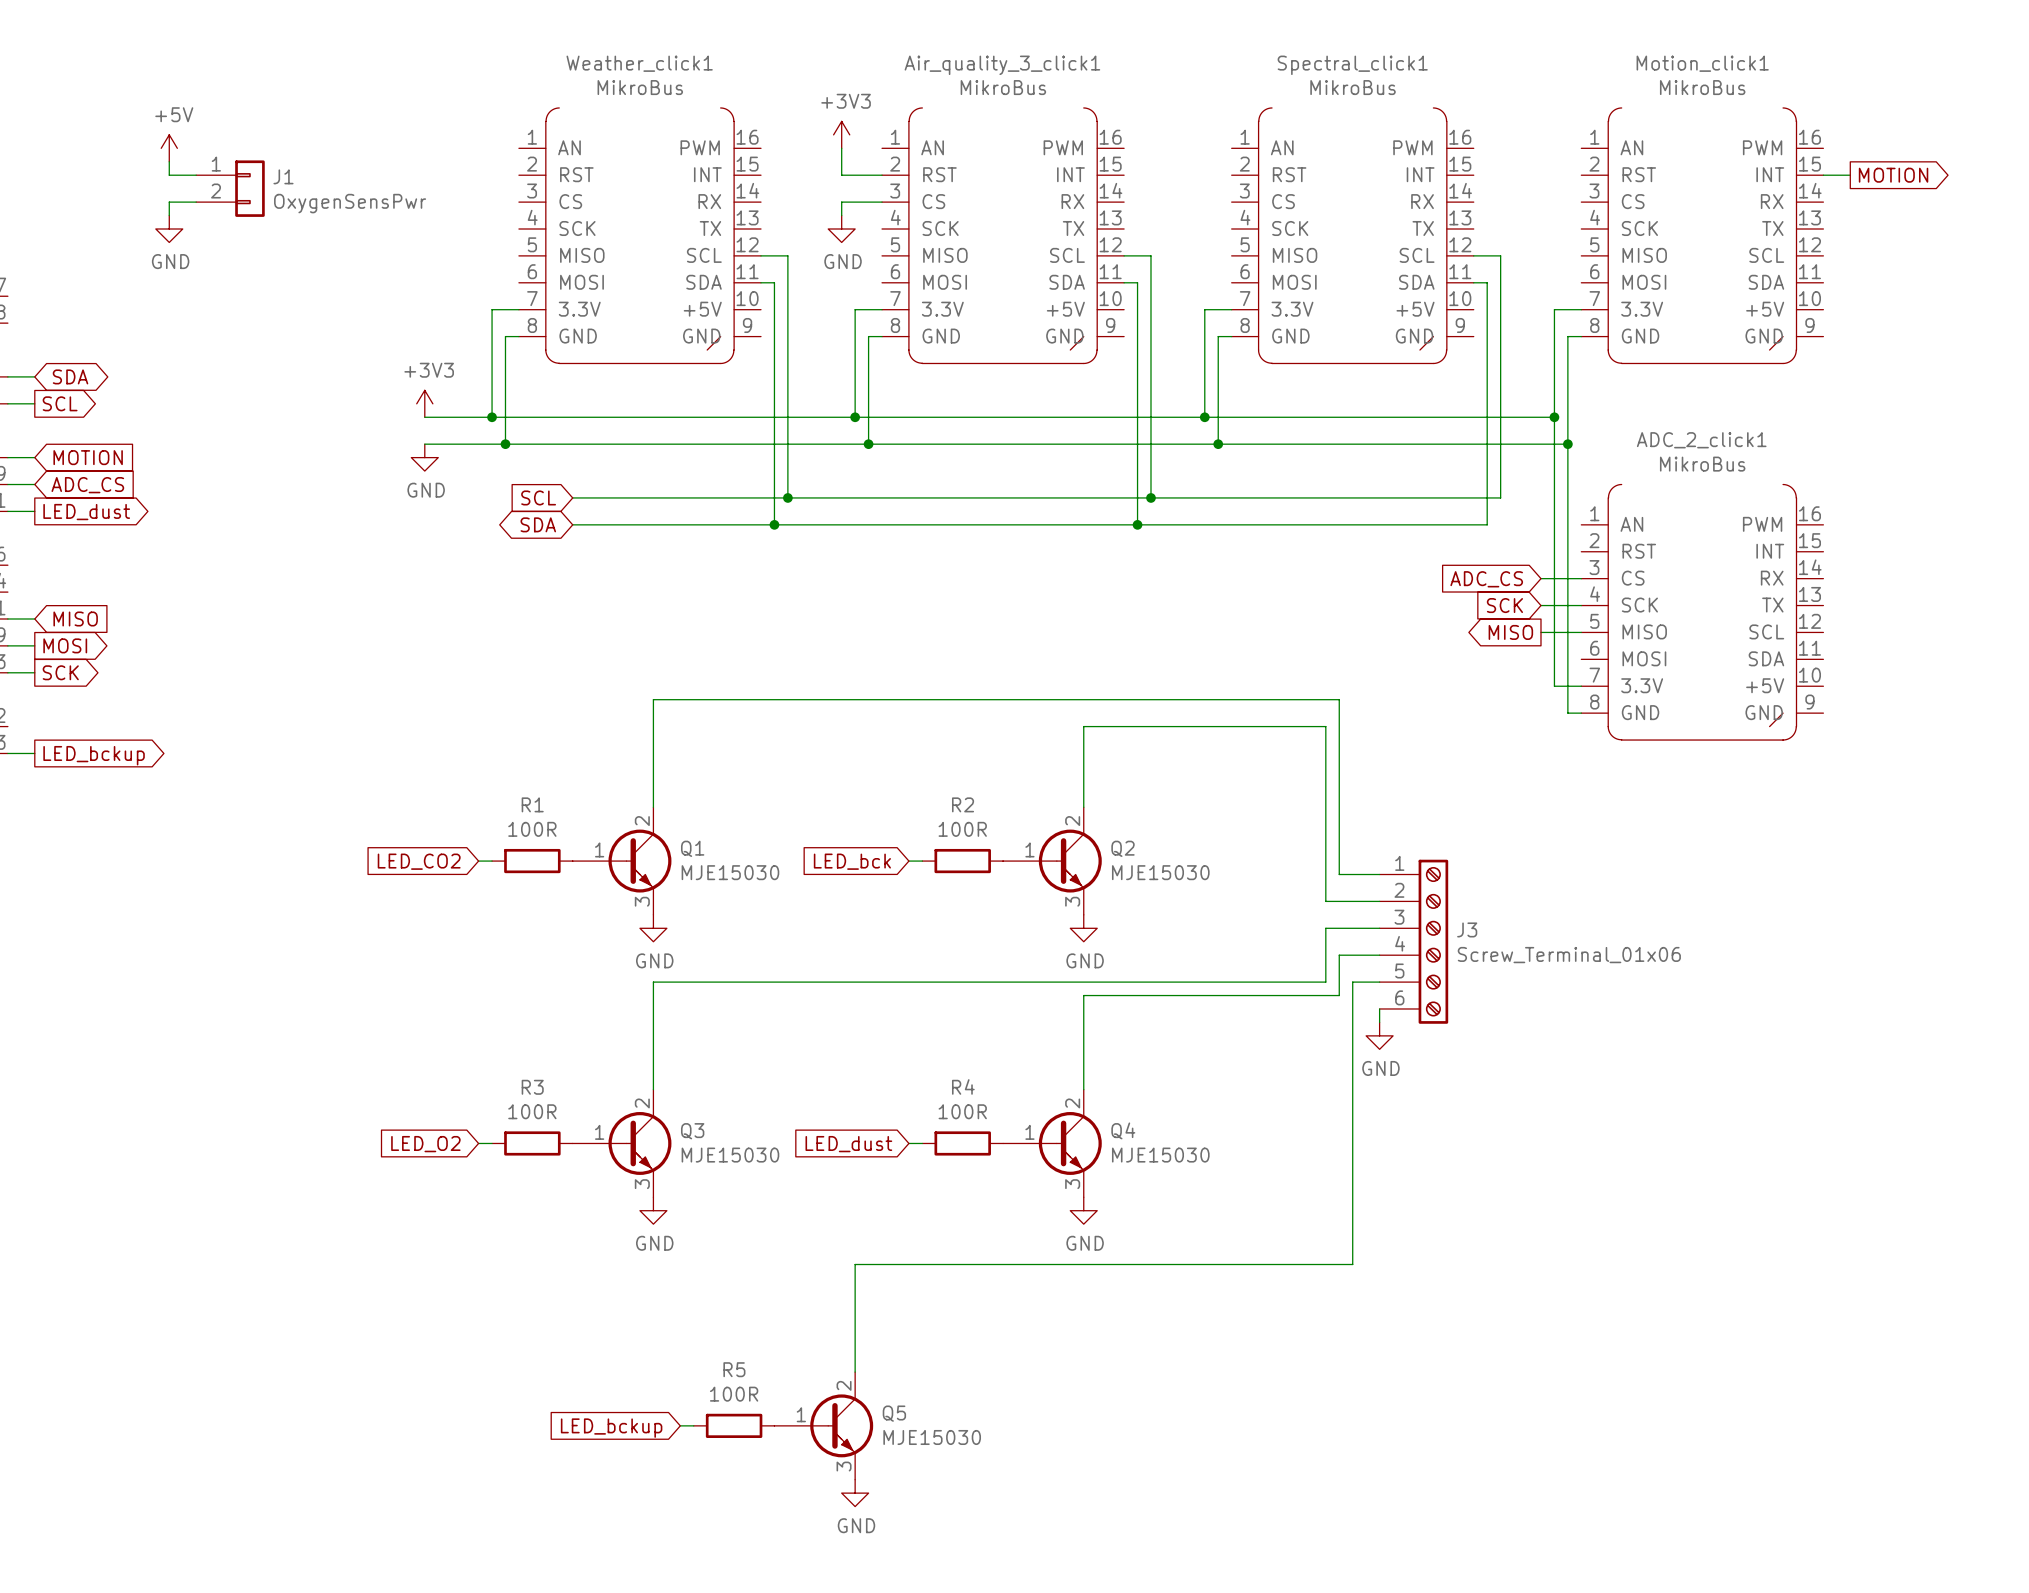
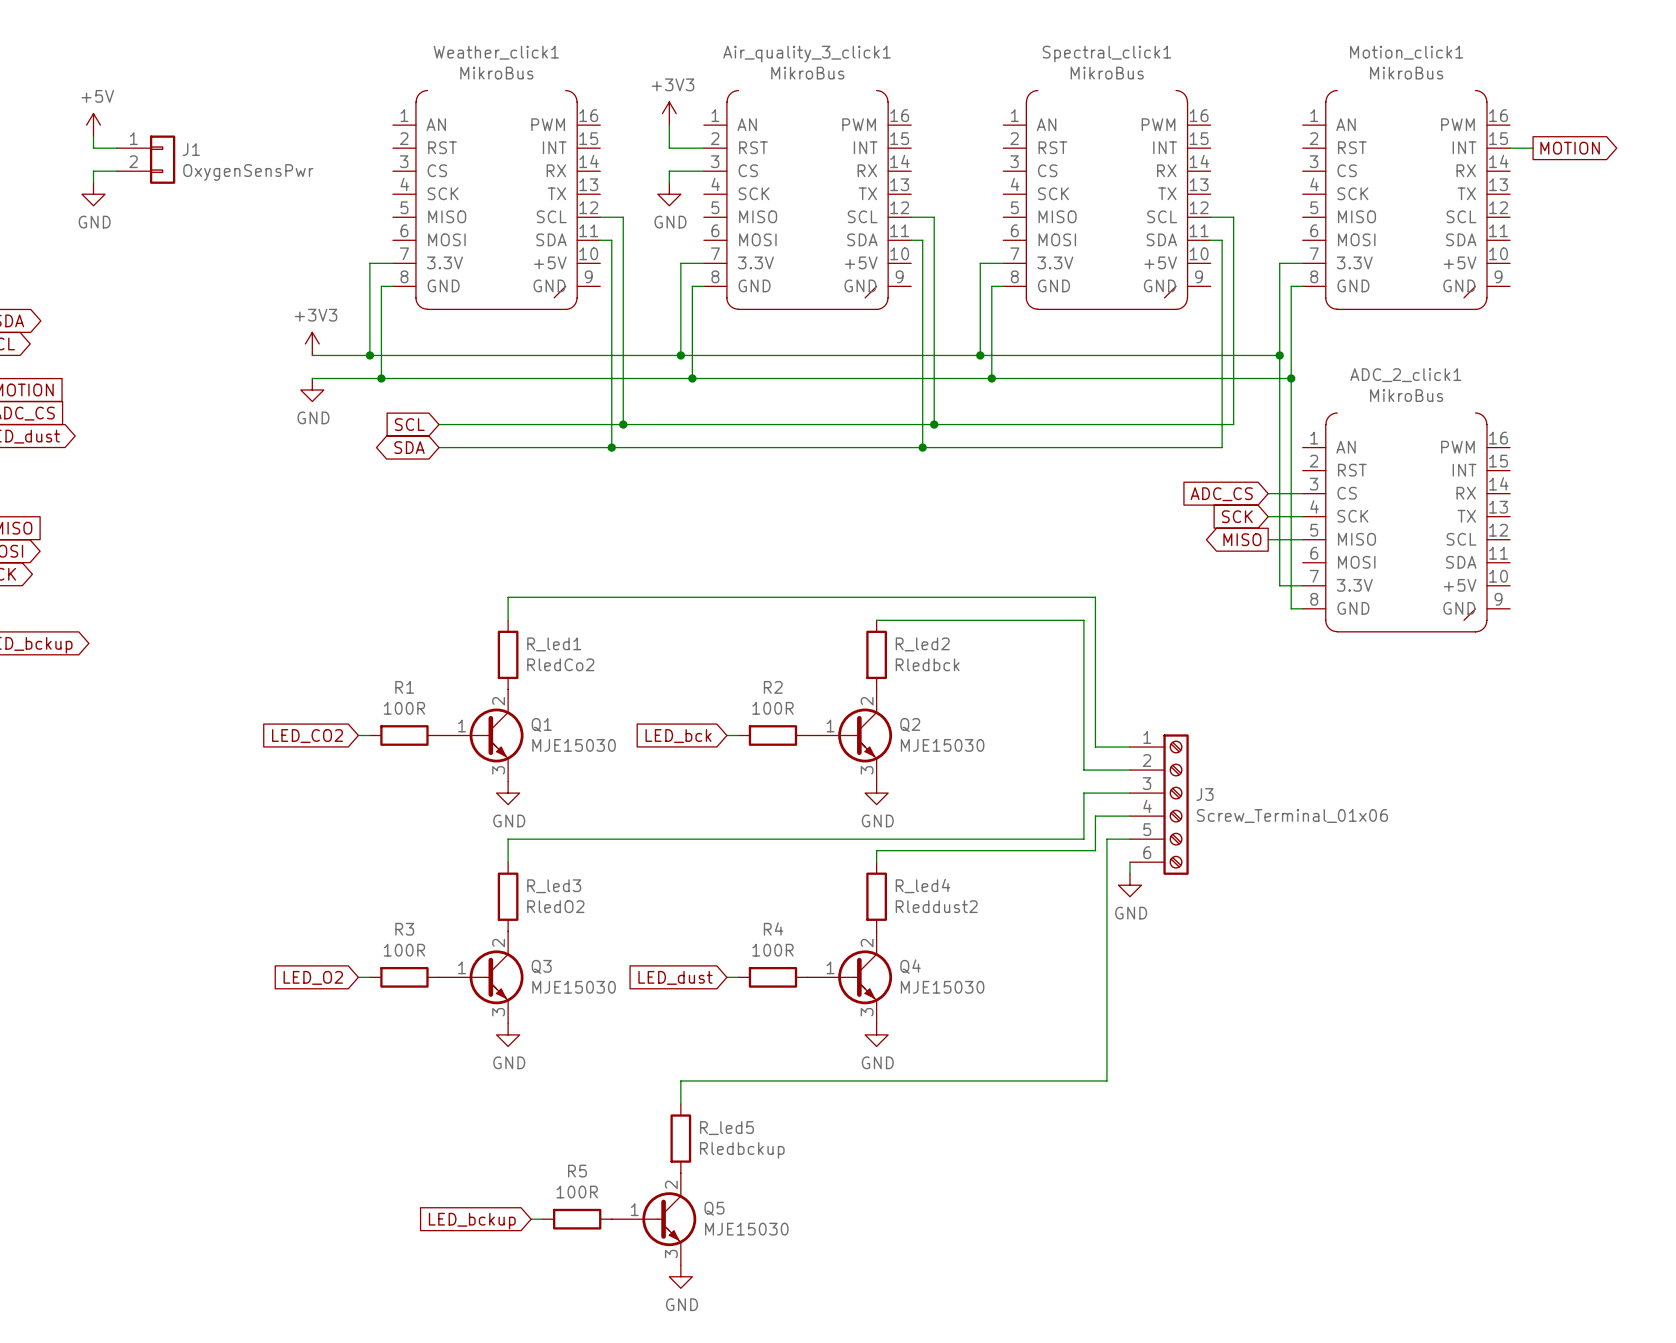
wire: (653, 726) (653, 807) -> none
wire: (1083, 726) (1083, 807) -> none
R_led1: none -> RledCo2 (508, 654)
R_led2: none -> Rledbck (876, 654)
wire: (653, 1008) (653, 1089) -> none
wire: (1083, 1008) (1083, 1089) -> none
R_led3: none -> RledO2 (508, 896)
R_led4: none -> Rleddust2 (876, 896)
wire: (855, 1291) (855, 1372) -> none
R_led5: none -> Rledbckup (680, 1138)

